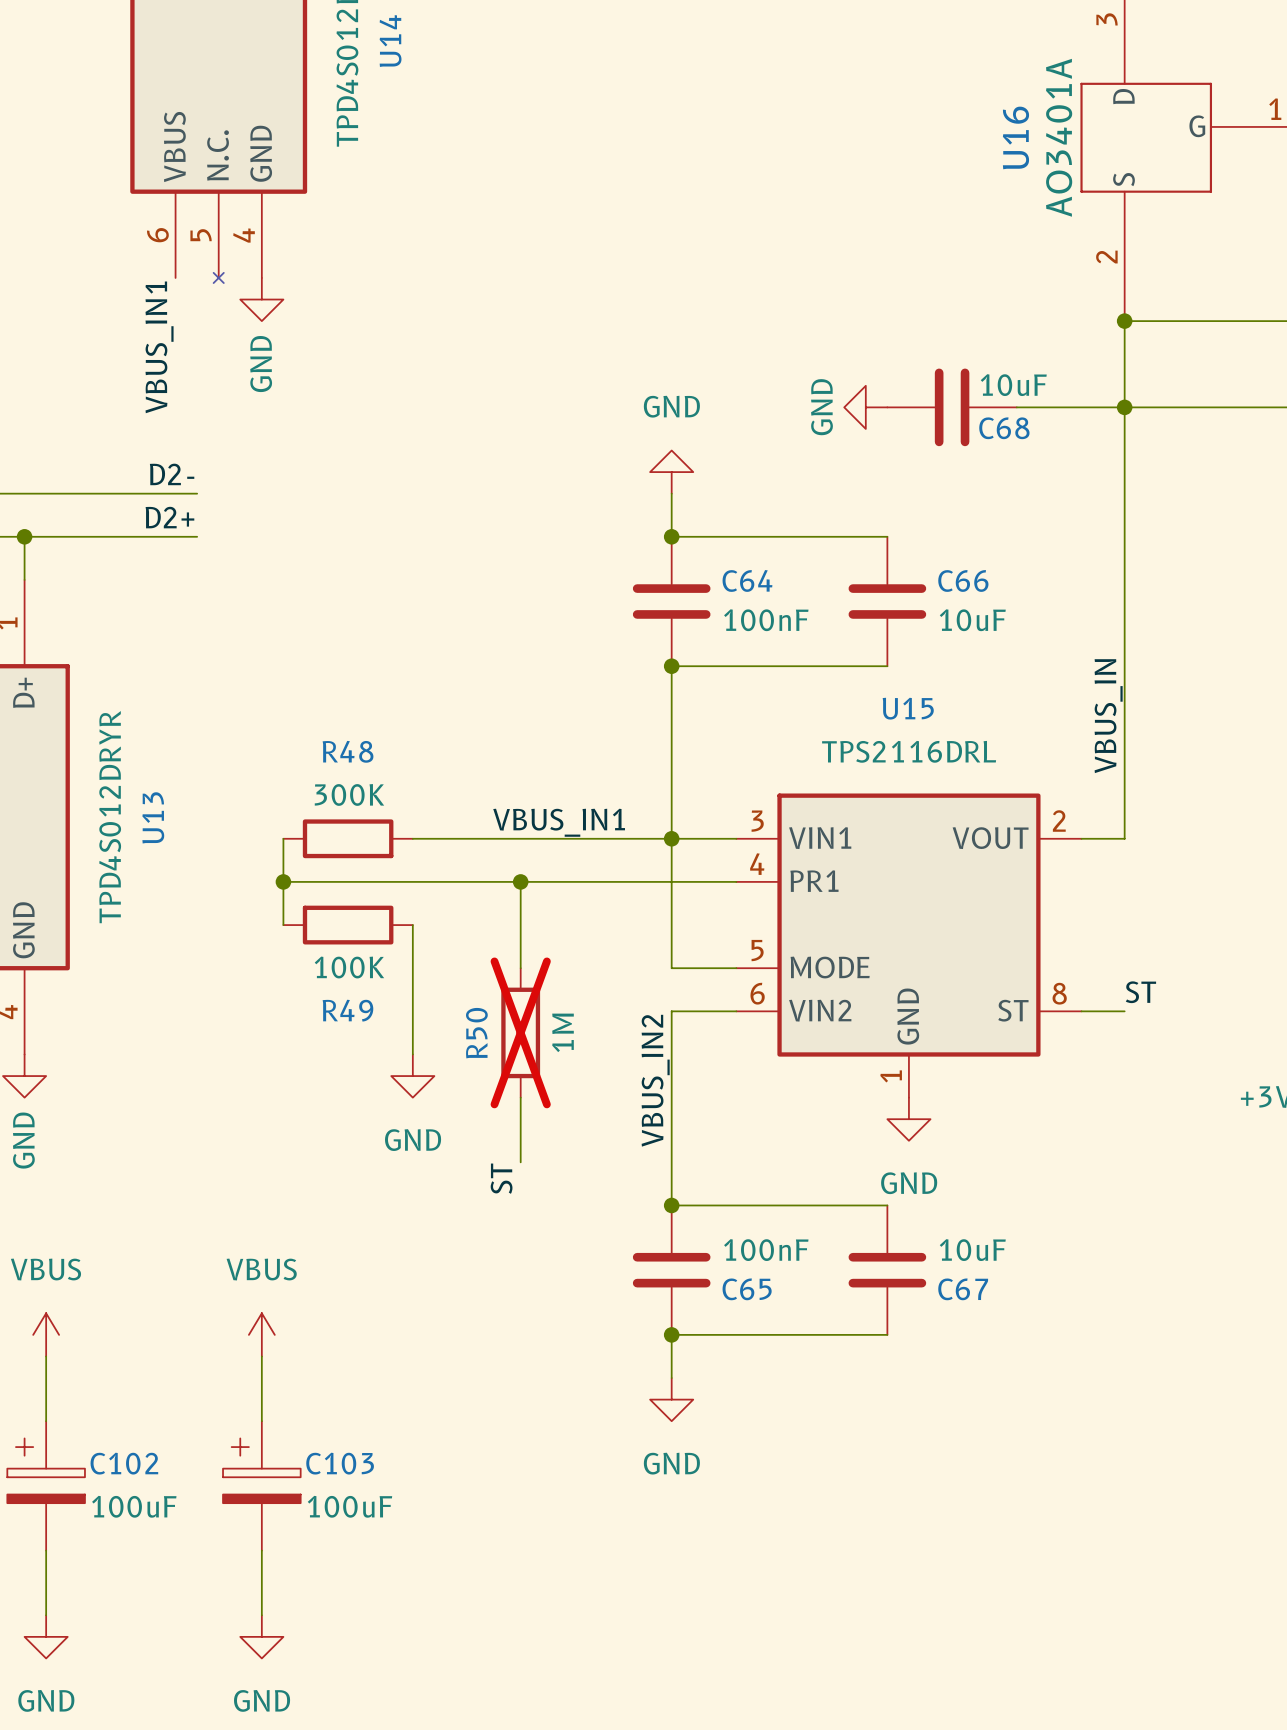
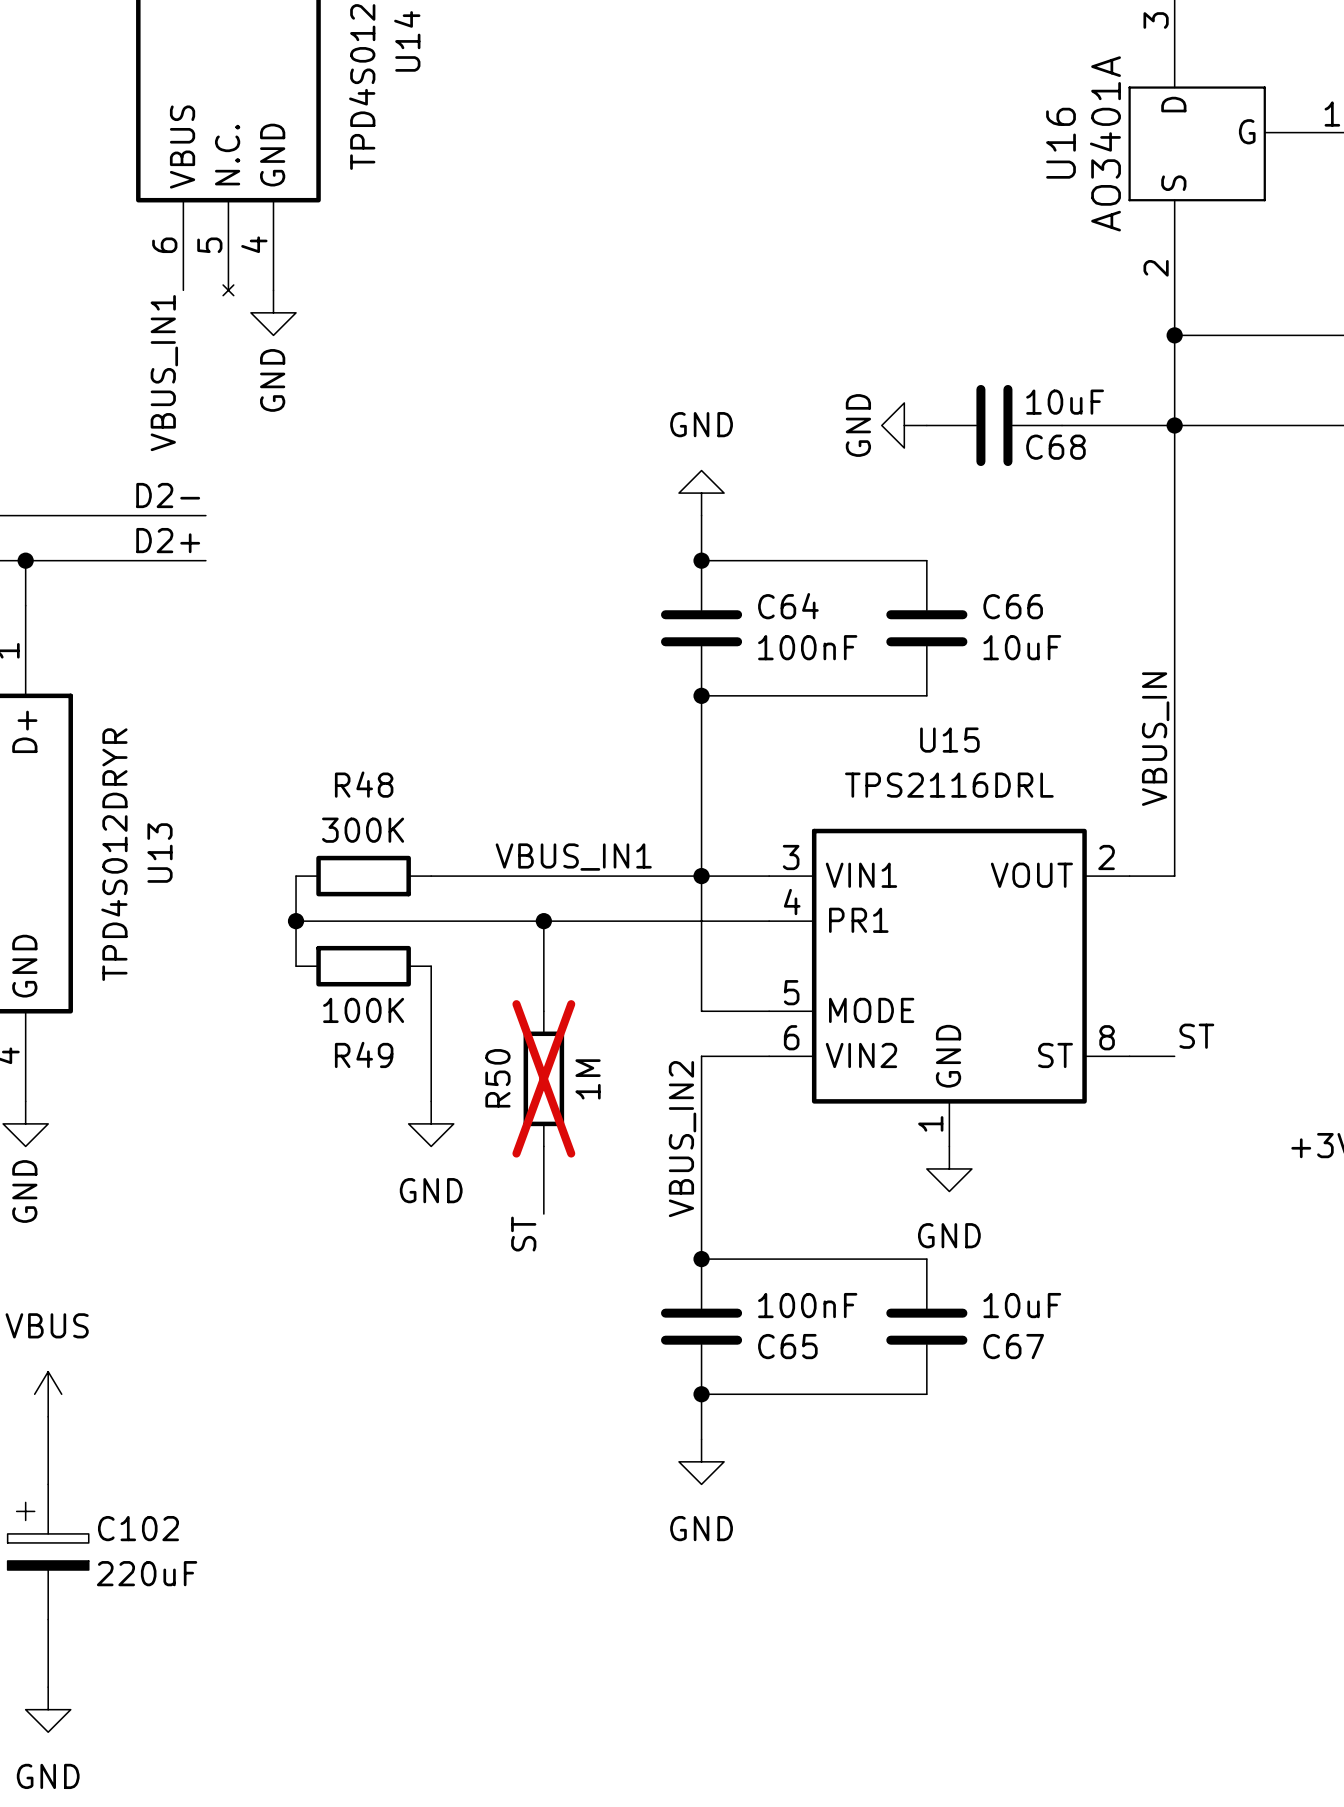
power symbol: VBUS (261, 1334) -> none
wire: (261, 1356) (261, 1421) -> none
C103: 100uF (261, 1485) -> none
C102 value: 100uF (134, 1506) -> 220uF (147, 1573)
wire: (261, 1550) (261, 1615) -> none
power symbol: GND (261, 1636) -> none

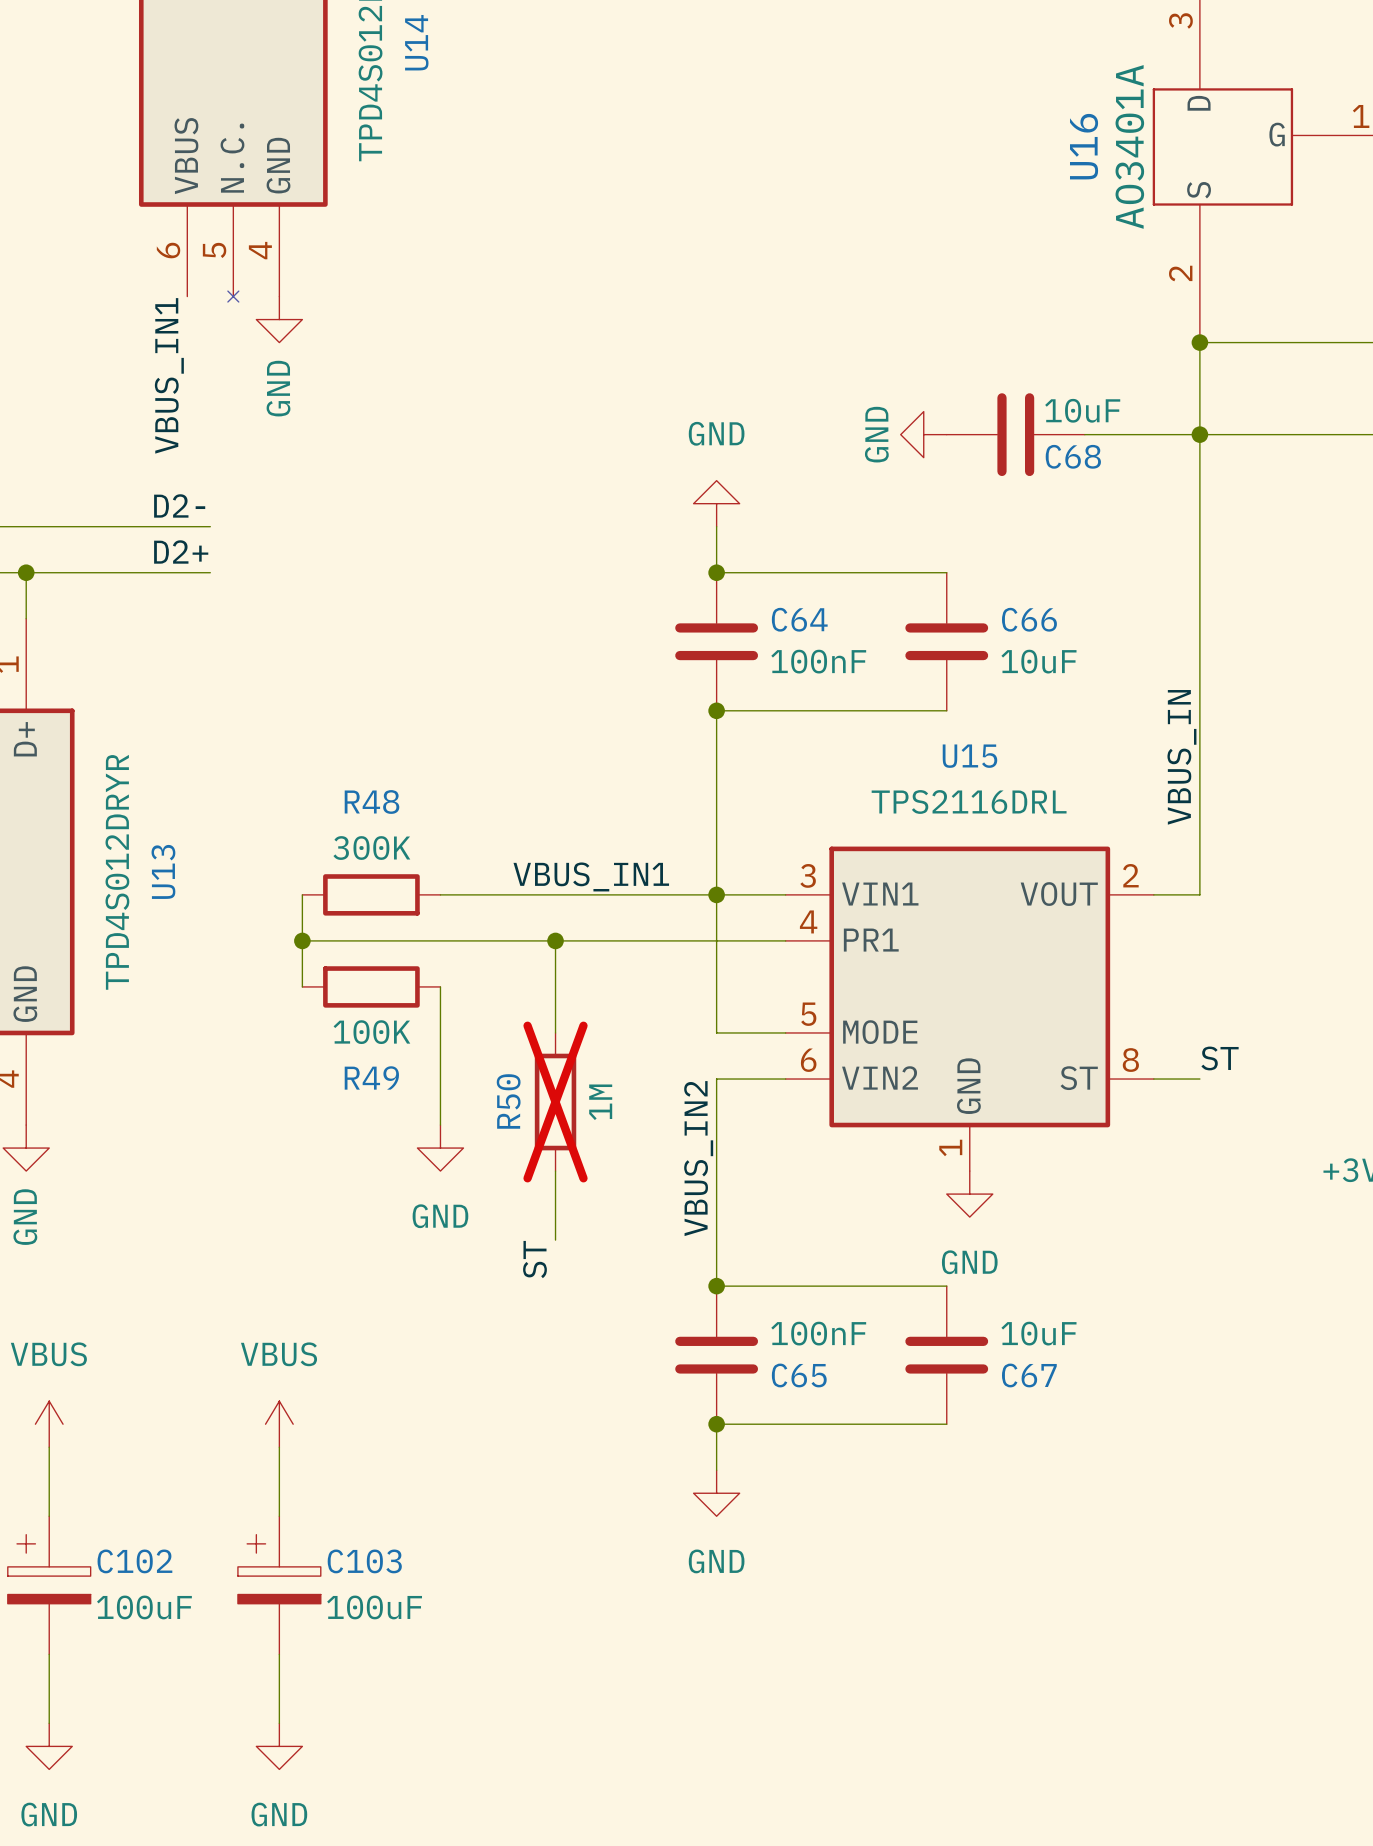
power symbol: none -> VBUS (279, 1424)
wire: none -> (279, 1447) (279, 1516)
C103: none -> 100uF (279, 1585)
C102 value: 220uF (147, 1573) -> 100uF (144, 1607)
wire: none -> (279, 1654) (279, 1723)
power symbol: none -> GND (279, 1746)

